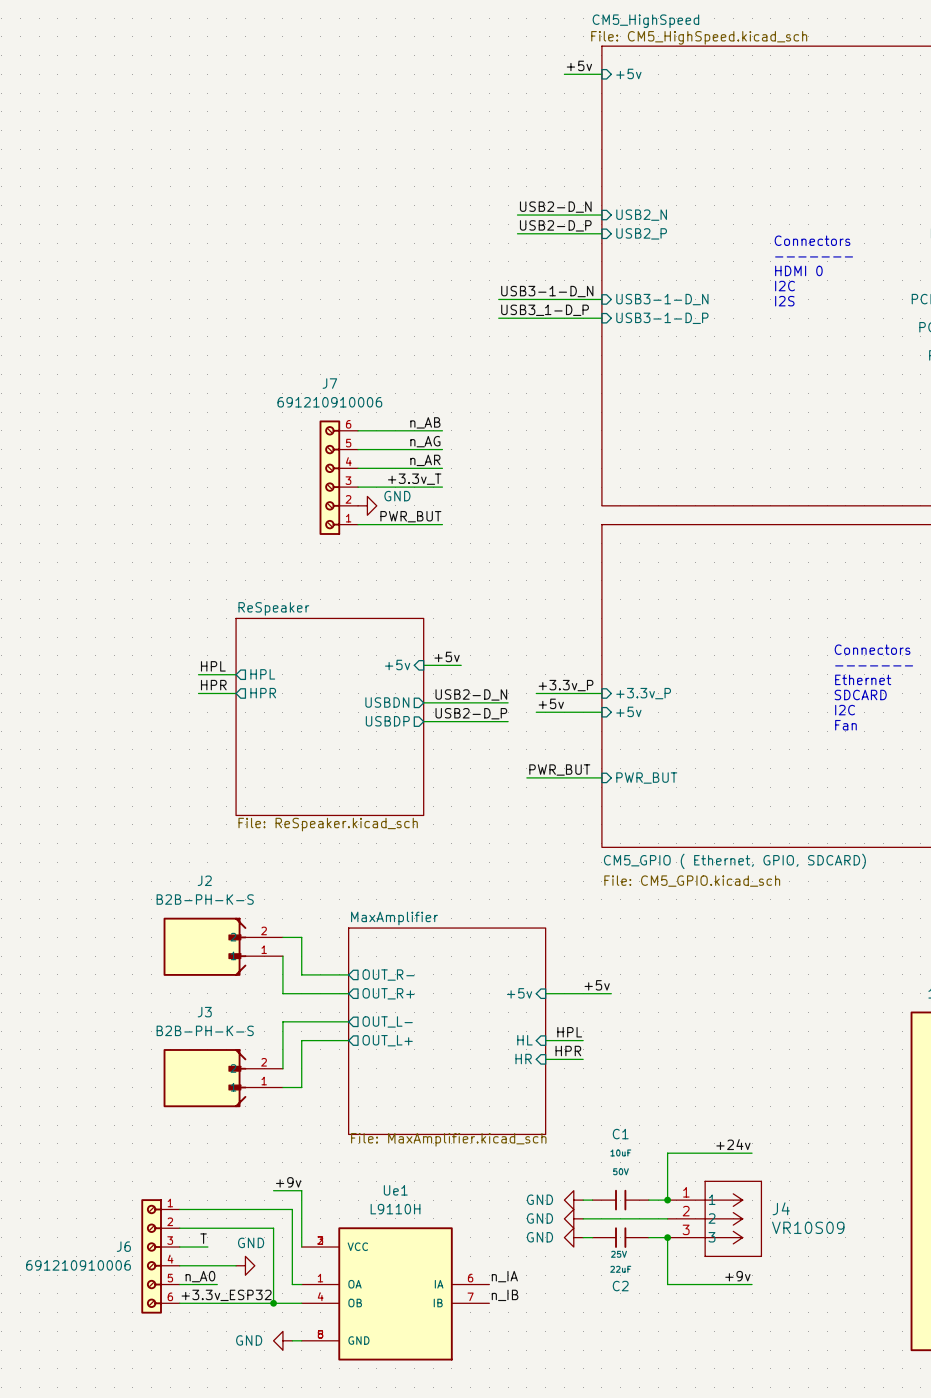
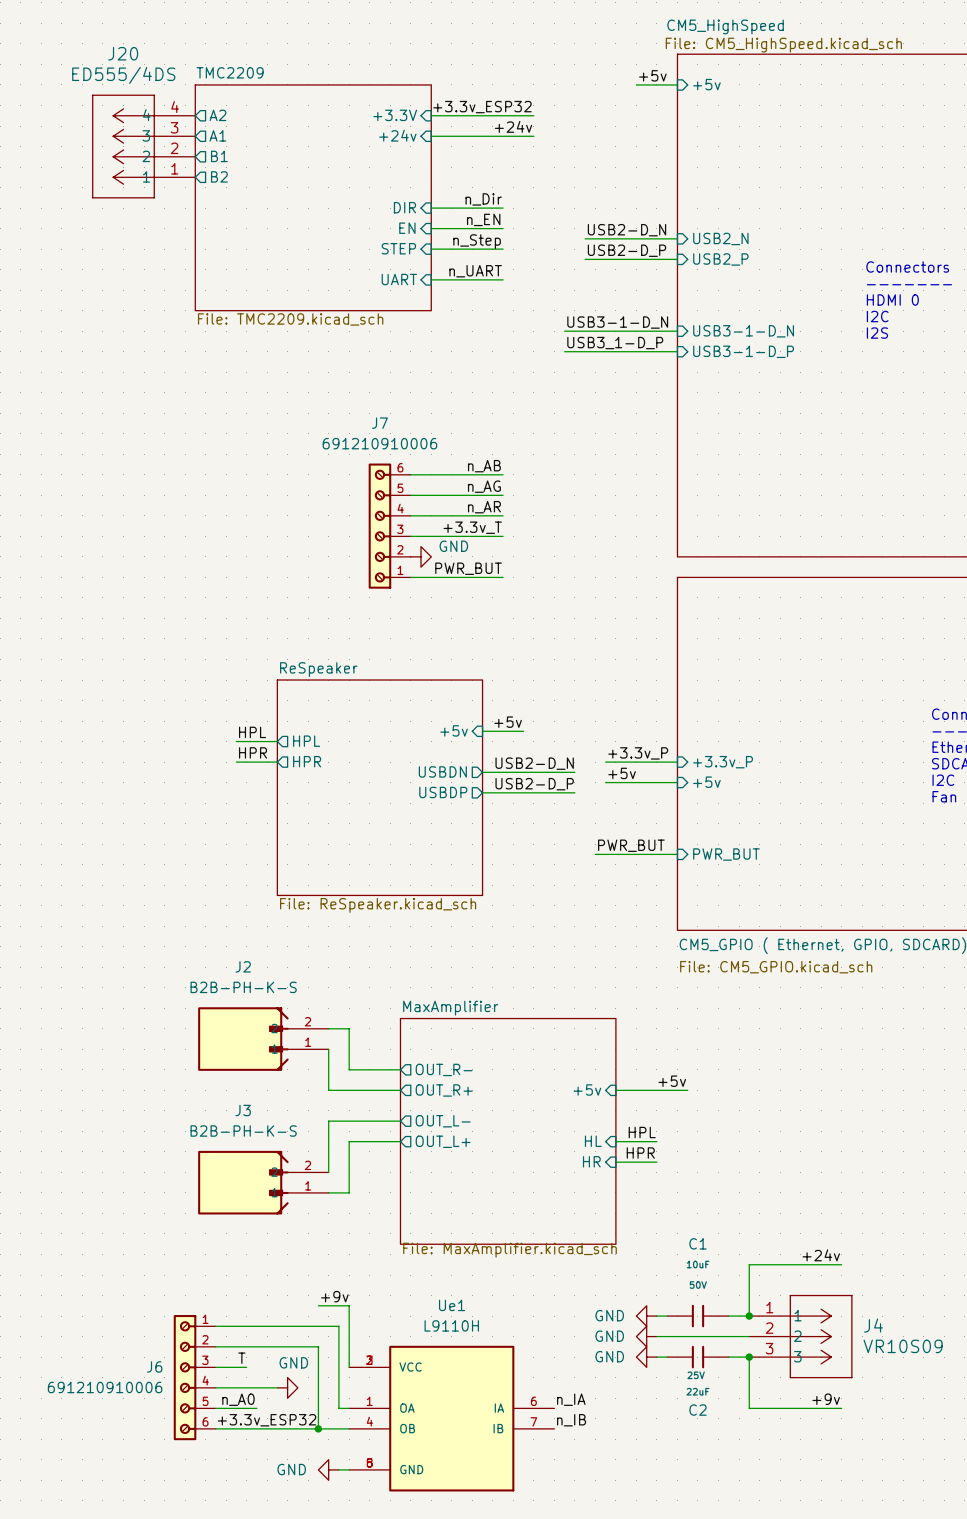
label: none -> +3.3v_ESP32 (482, 107)
sheet pin: none -> A2 (217, 115)
sheet pin: none -> +3.3V (395, 115)
wire: none -> (431, 115) (533, 115)
label: none -> +24v (513, 126)
sheet pin: none -> A1 (217, 135)
sheet pin: none -> +24v (397, 135)
wire: none -> (431, 136) (533, 136)
J20: none -> ED555/4DS (143, 146)
sheet pin: none -> B1 (219, 156)
sheet pin: none -> B2 (219, 176)
sheet TMC2209: none -> File: TMC2209.kicad_sch (313, 197)
label: none -> n_Dir (483, 199)
sheet pin: none -> DIR (404, 207)
wire: none -> (431, 208) (503, 208)
label: none -> n_EN (483, 219)
sheet pin: none -> EN (407, 228)
wire: none -> (431, 228) (503, 228)
label: none -> n_Step (477, 241)
sheet pin: none -> STEP (398, 248)
wire: none -> (431, 249) (503, 249)
label: none -> n_UART (475, 271)
sheet pin: none -> UART (399, 279)
wire: none -> (431, 279) (503, 279)

